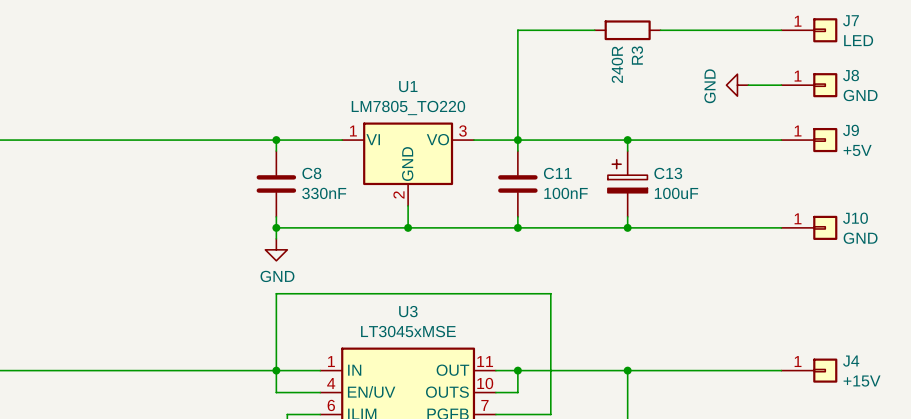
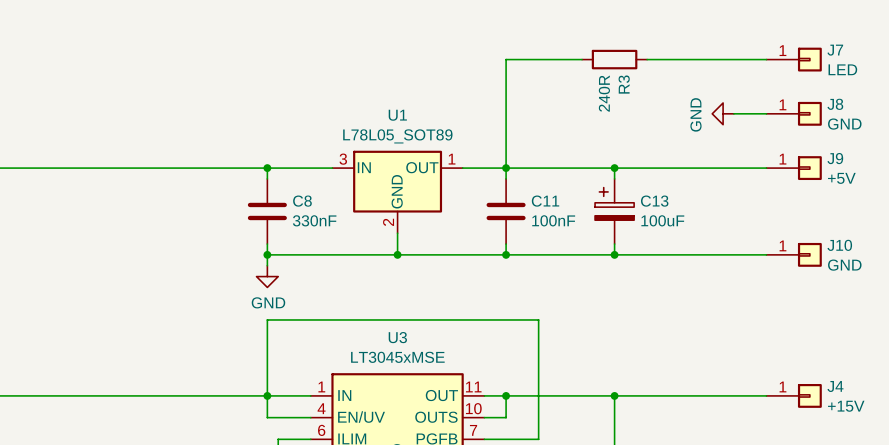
U1 value: LM7805_TO220 (408, 108) -> L78L05_SOT89 (397, 136)
U1 pin number: 1 (353, 131) -> 3 (343, 159)
U1 pin number: 3 (462, 131) -> 1 (452, 159)
U1 pin name: VI (373, 139) -> IN (364, 167)
U1 pin name: VO (437, 139) -> OUT (422, 167)

